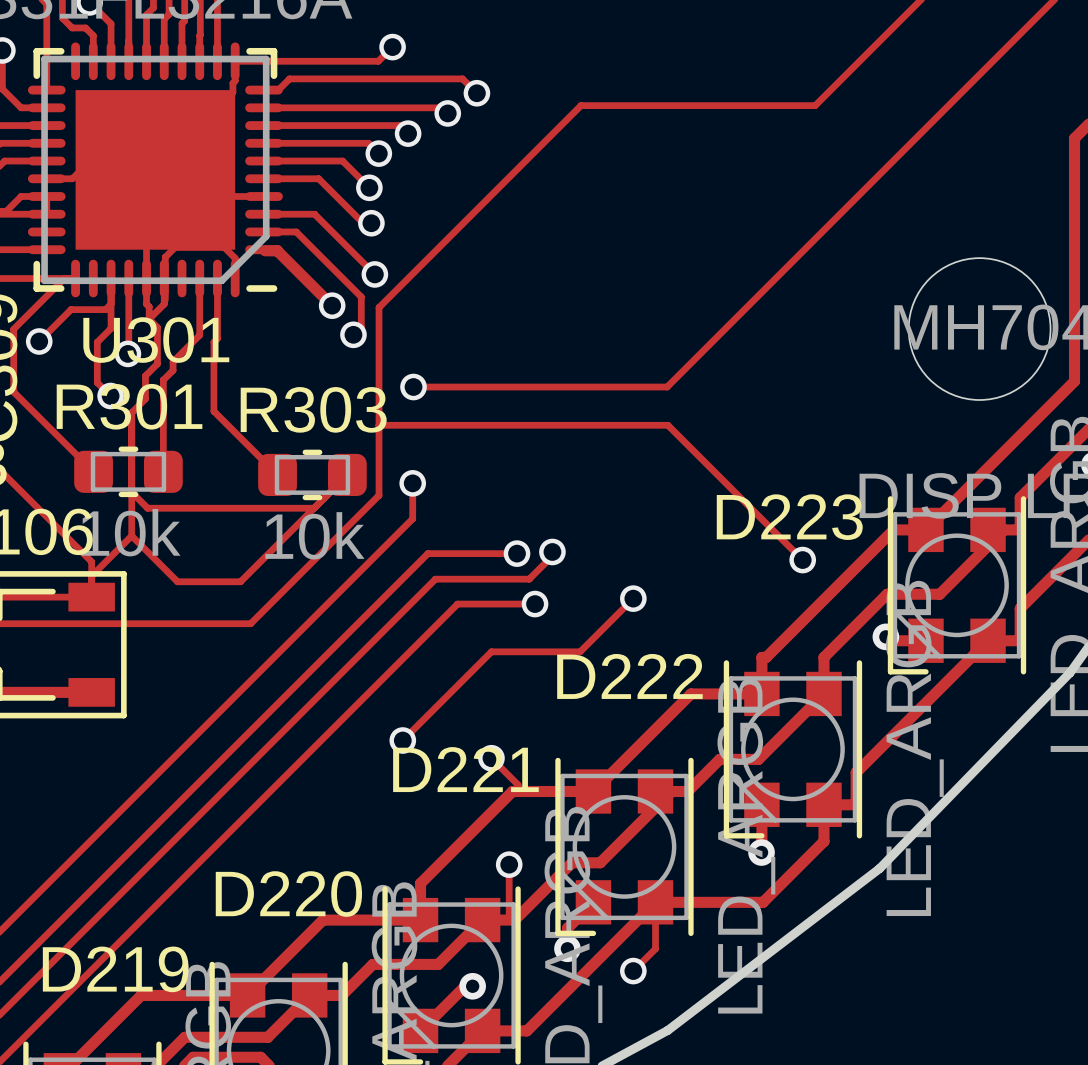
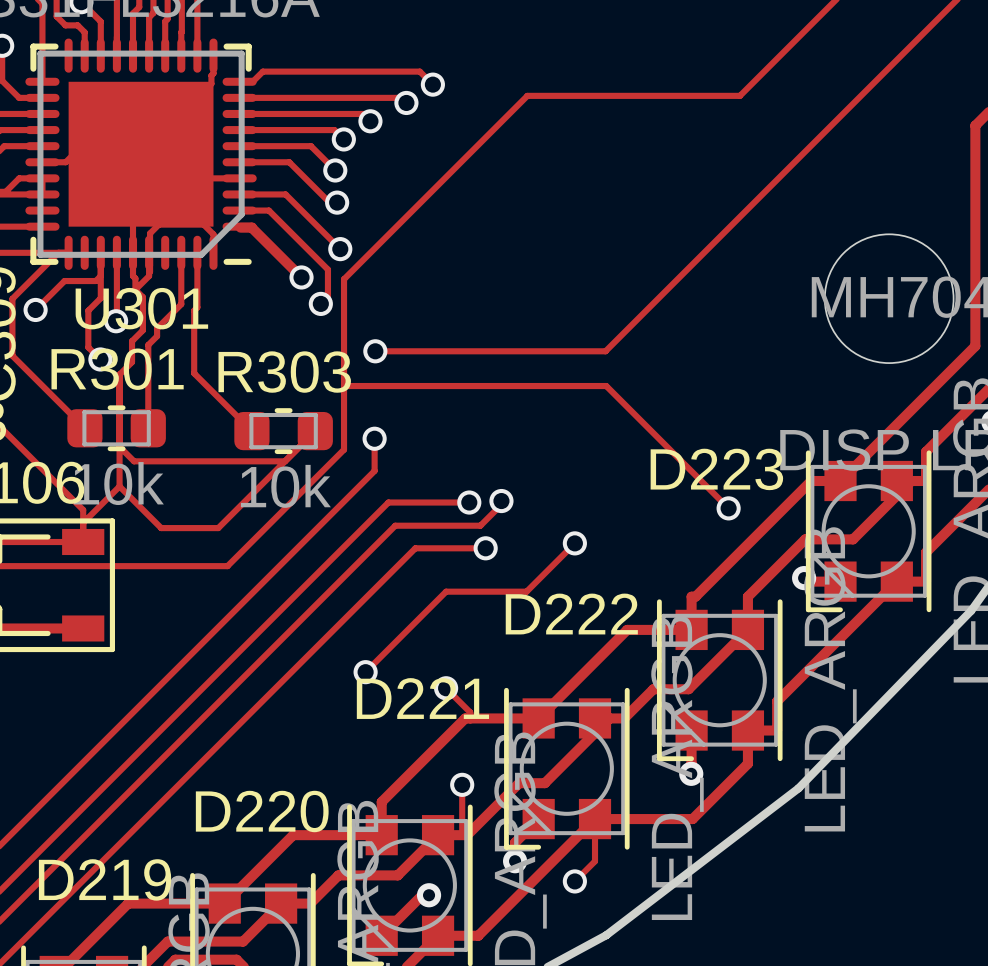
track: (392, 47) (378, 61) (235, 61) -> none
via: (392, 47) -> none

